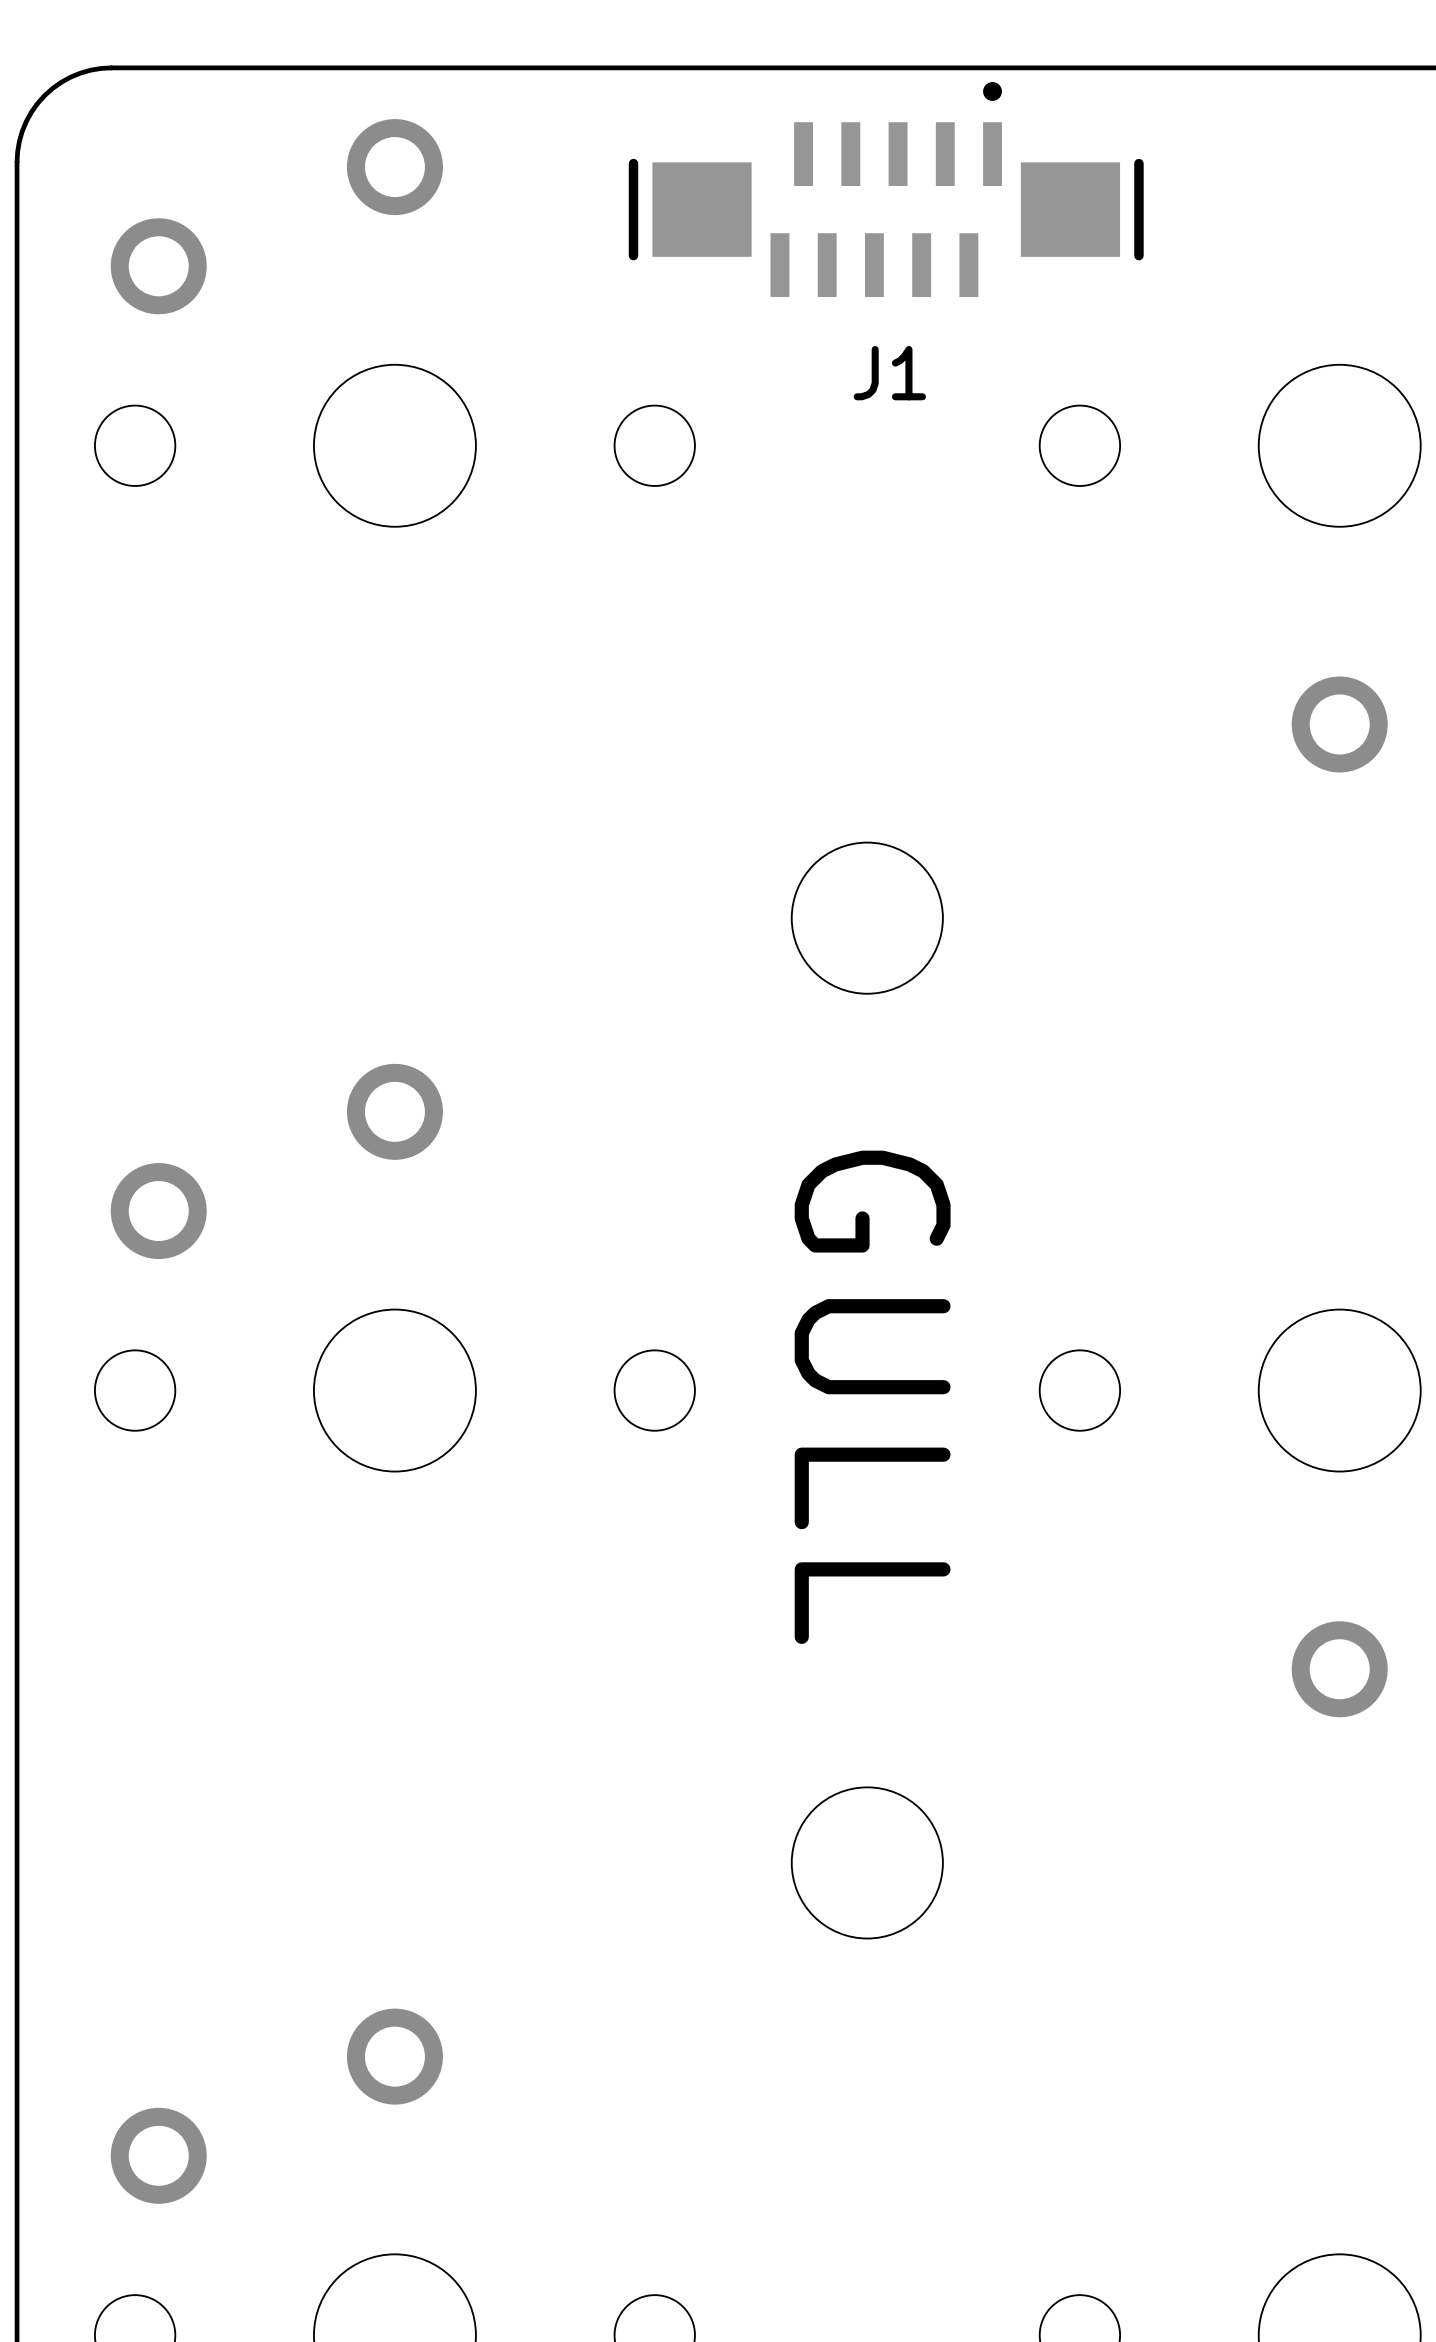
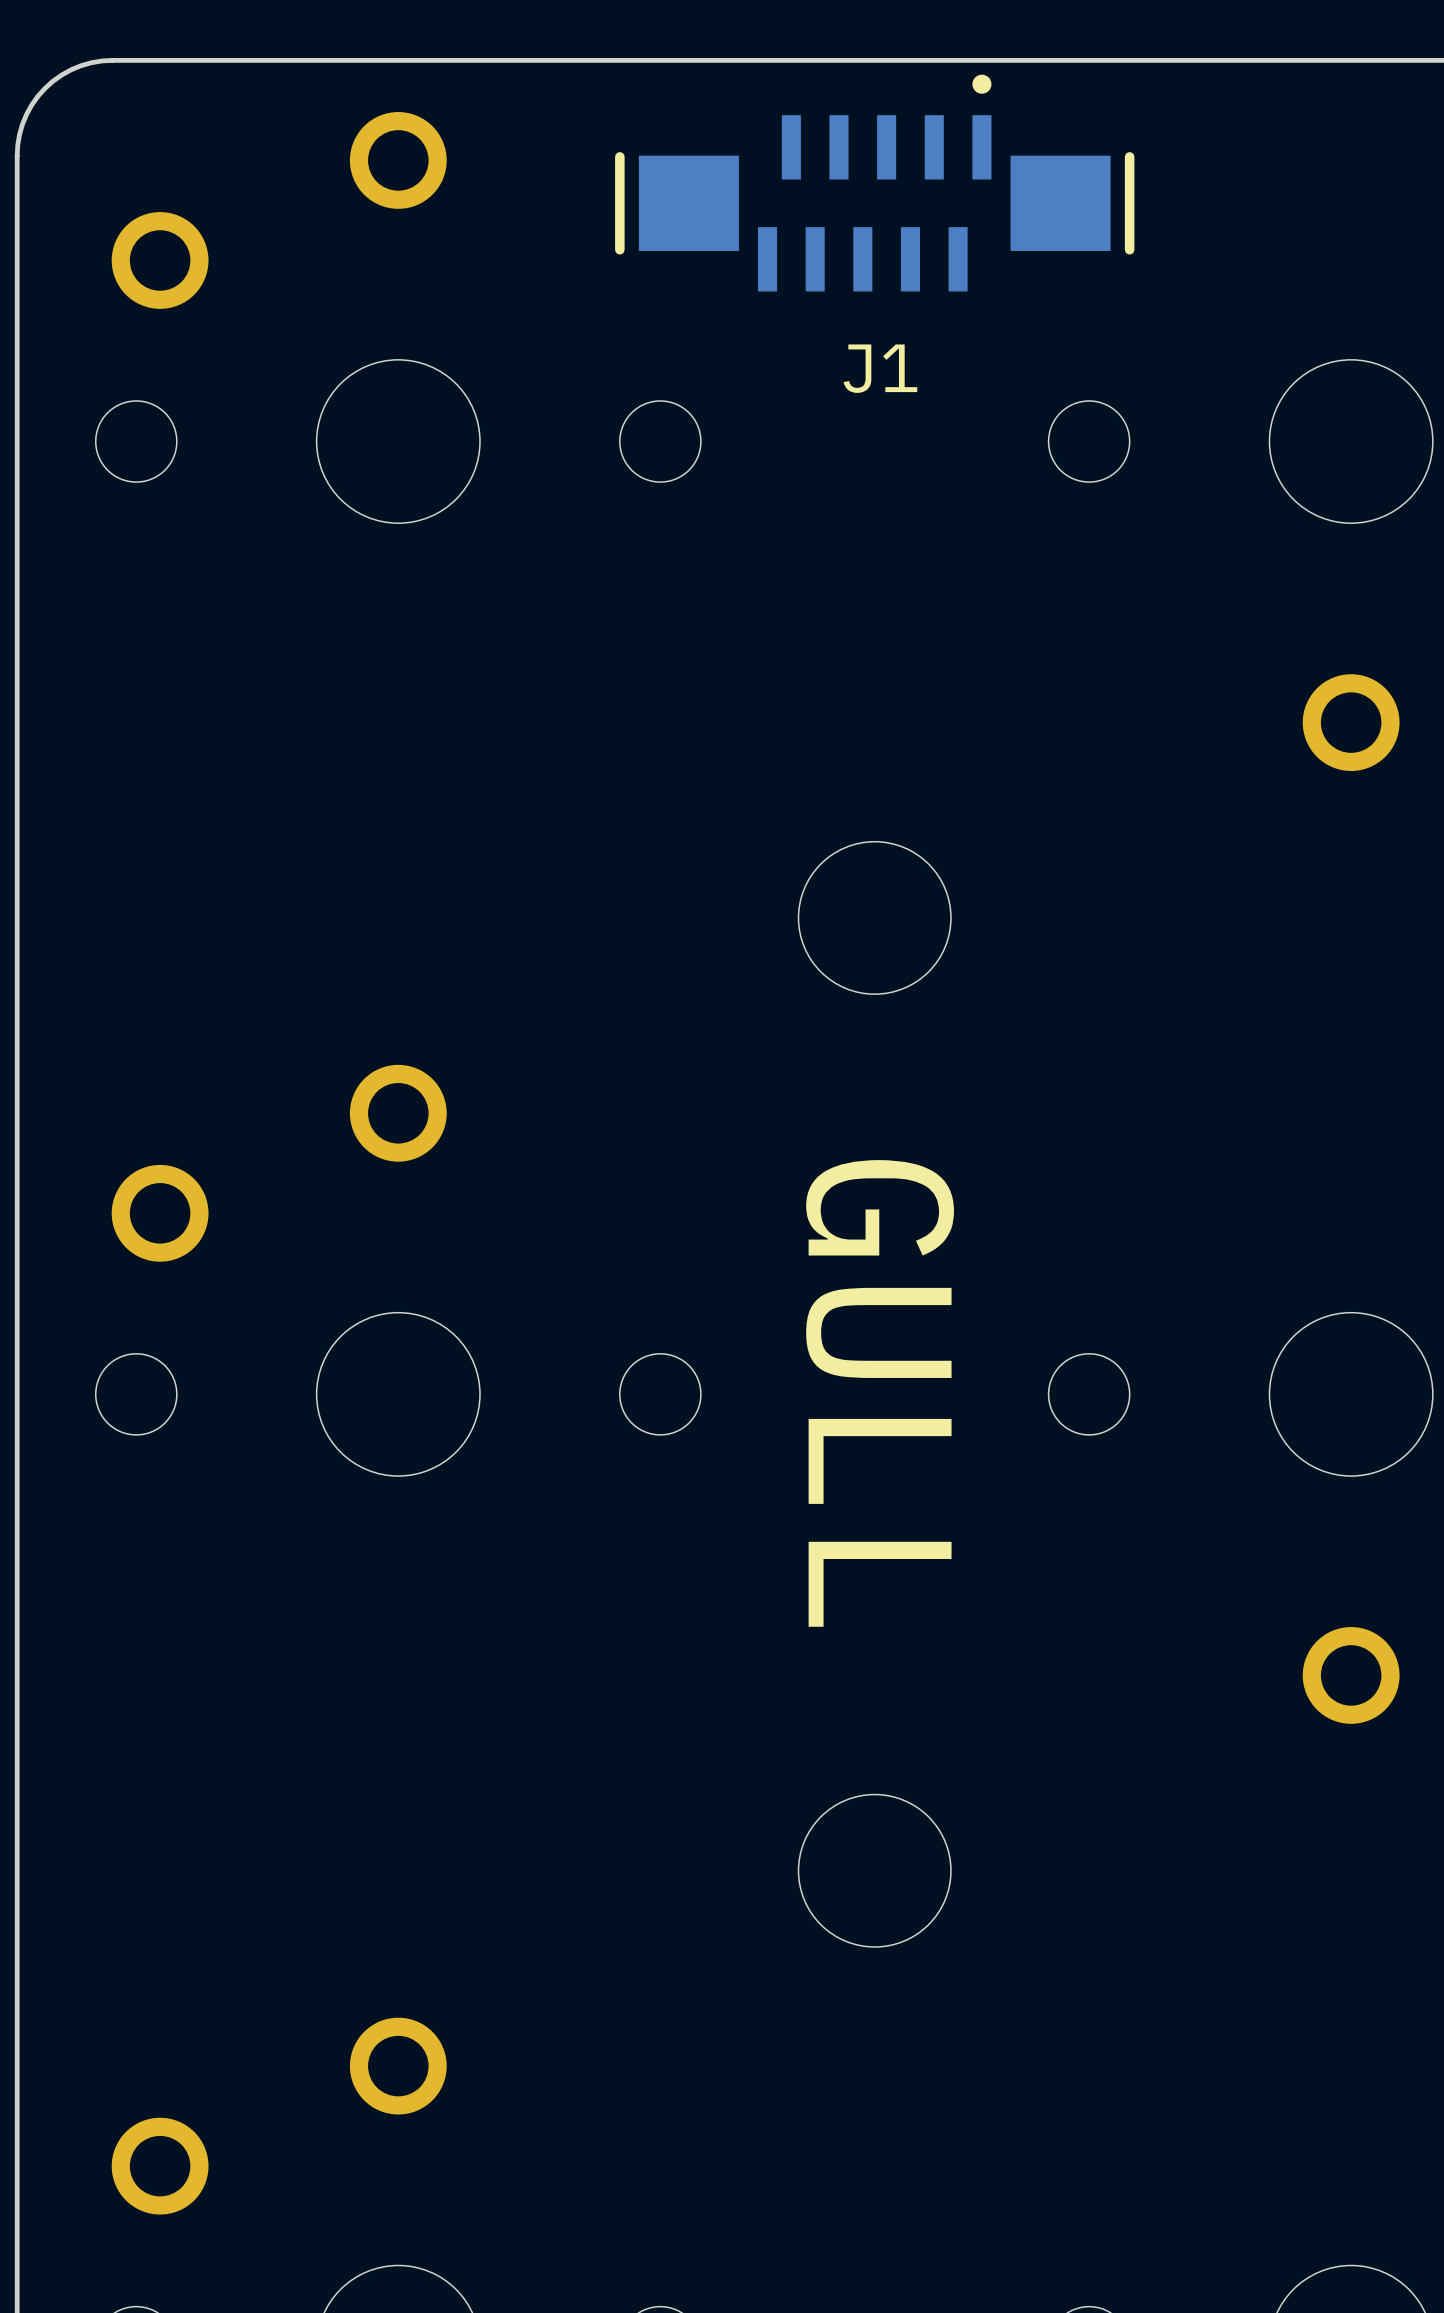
J1 position: (886, 189) -> (874, 183)

